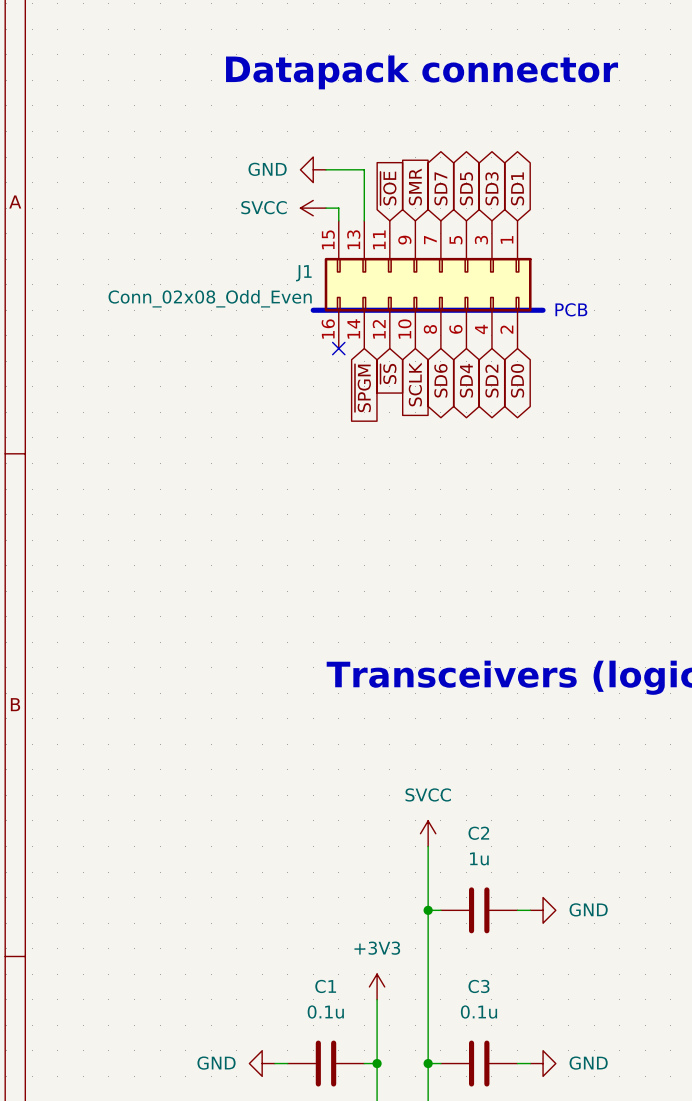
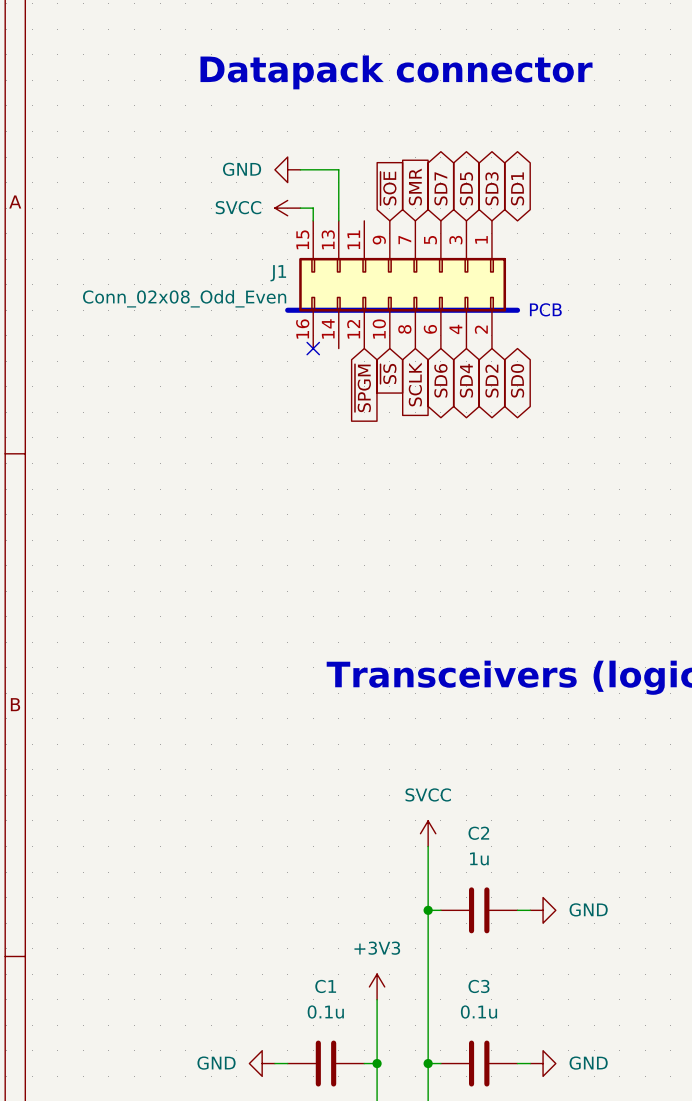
text position: Datapack connector (422, 72) -> Datapack connector (396, 72)
power symbol position: GND (313, 169) -> GND (287, 169)
wire: (338, 169) (364, 169) (364, 220) -> (338, 169) (338, 208)
power symbol position: SVCC (313, 208) -> SVCC (287, 208)
wire: (326, 208) (338, 208) -> none
J1 position: (428, 284) -> (402, 284)
text position: PCB (571, 309) -> PCB (545, 309)
line: (517, 310) (543, 310) -> (287, 310) (313, 310)
no-connect mark position: (338, 348) -> (313, 348)

